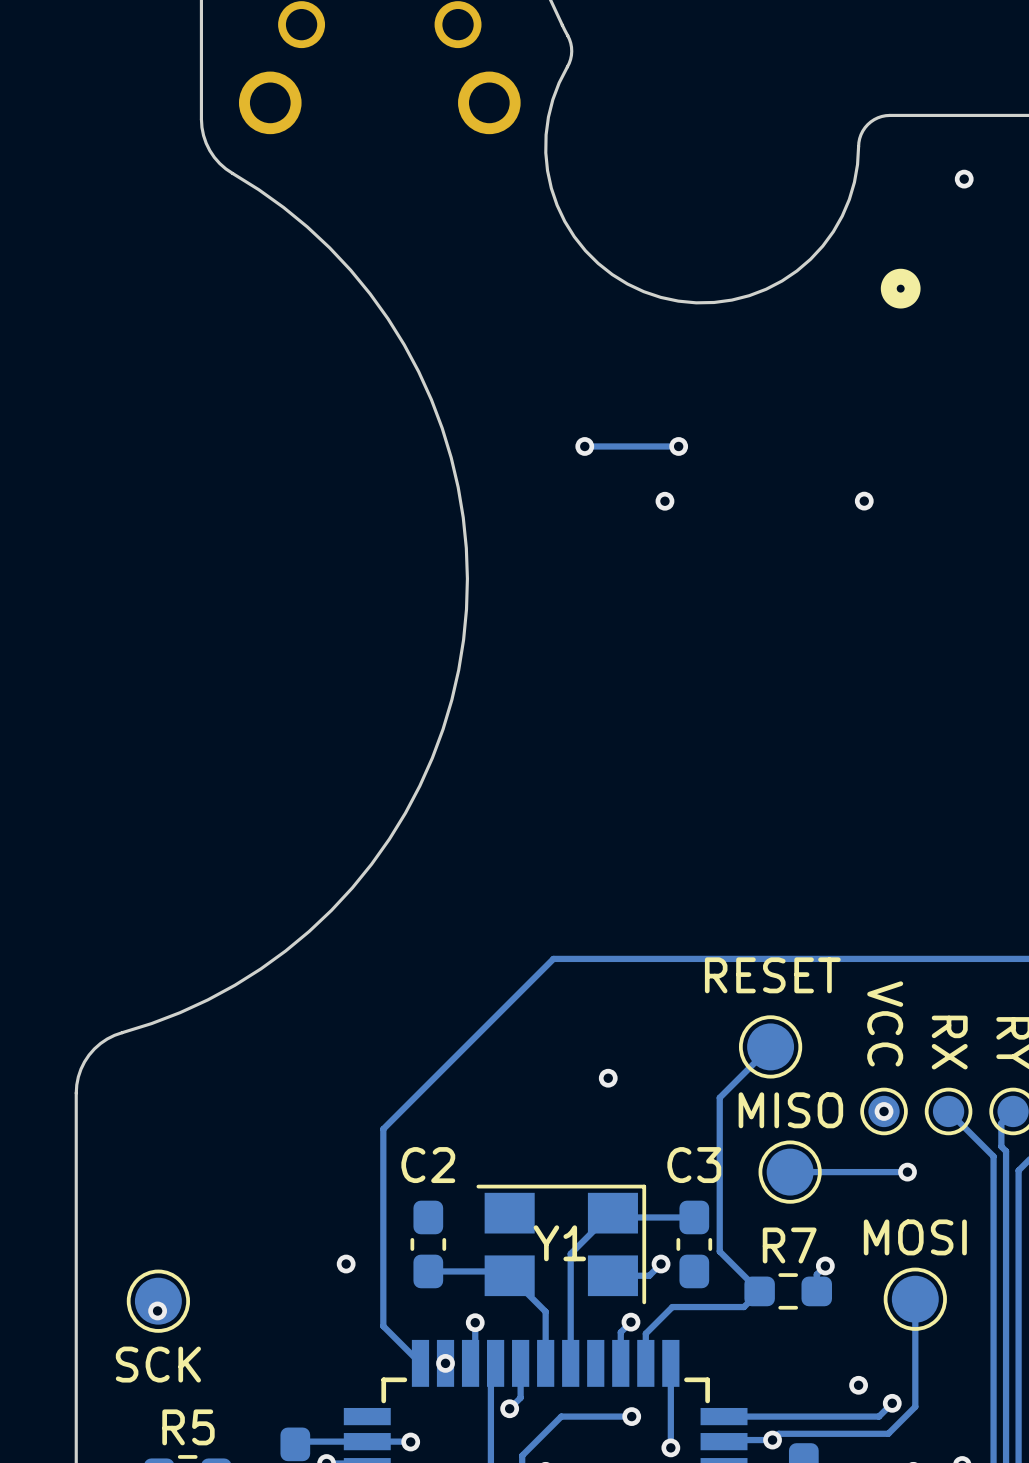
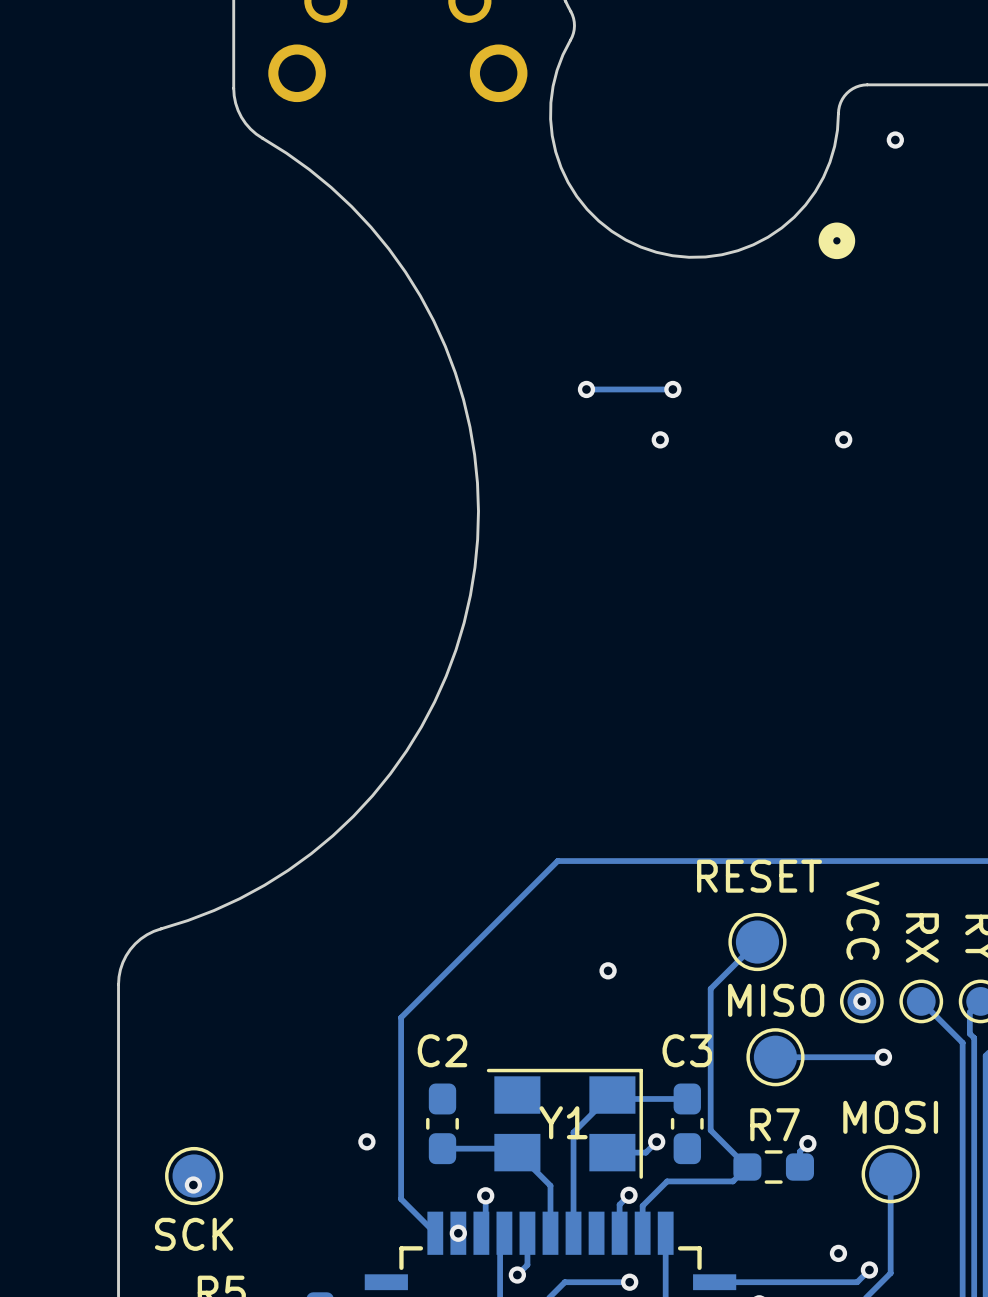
via position: (964, 179) -> (895, 140)
part position: (900, 288) -> (836, 240)

